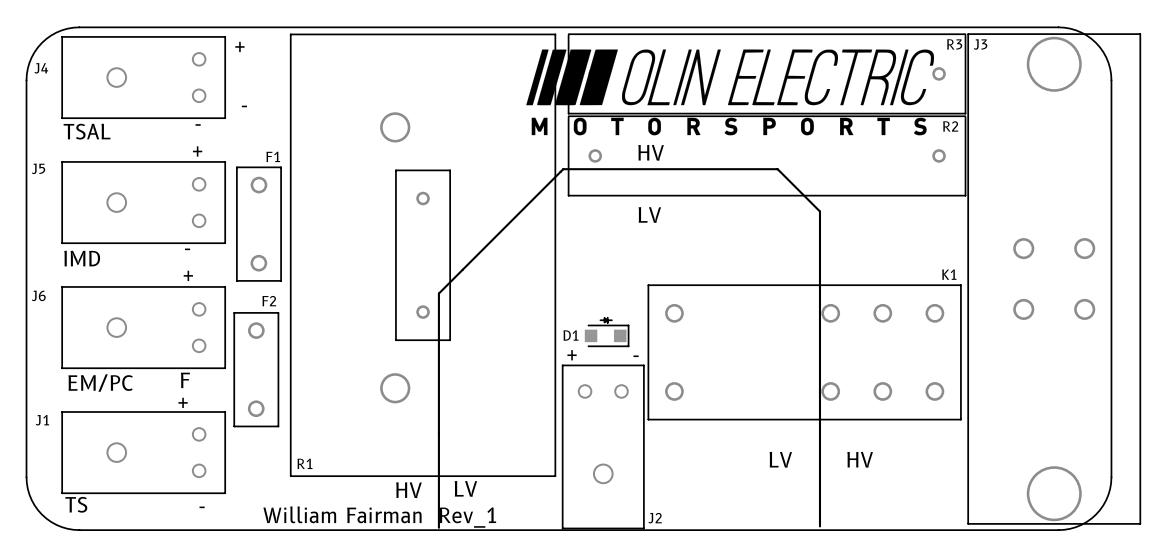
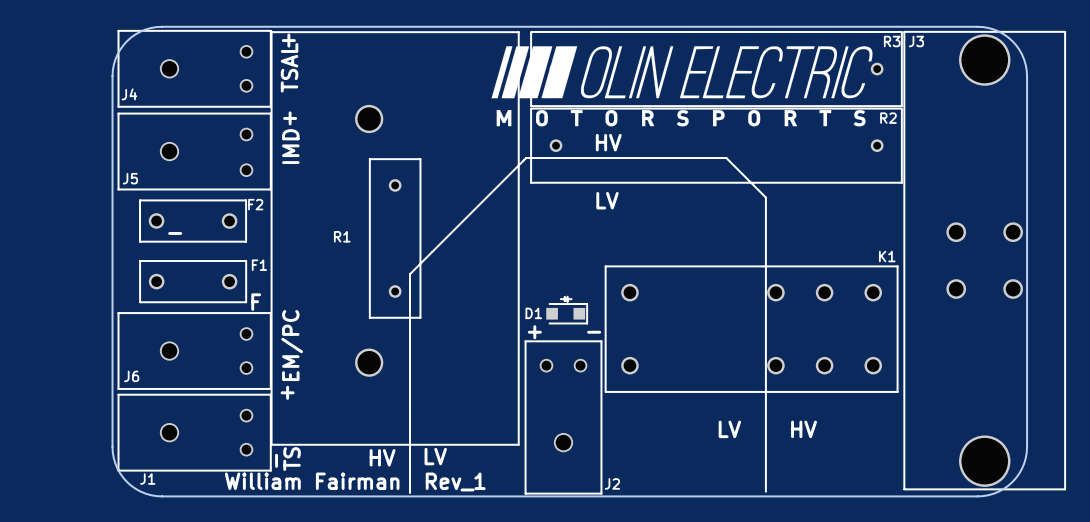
board edge: (79, 27) (1058, 27) (1081, 32) (1095, 42) (1103, 52) (1110, 68) (1111, 80) (1111, 477) (1106, 500) (1095, 514) (1086, 522) (1076, 527) (1058, 530) (79, 530) (56, 524) (42, 514) (34, 505) (26, 483) (26, 80) (31, 57) (42, 42) (56, 32) (79, 27) -> (161, 26) (140, 31) (126, 41) (117, 54) (112, 76) (112, 452) (115, 463) (123, 477) (140, 491) (161, 496) (977, 496) (993, 493) (1003, 488) (1012, 481) (1022, 468) (1027, 446) (1027, 76) (1025, 65) (1019, 49) (1012, 41) (999, 31) (977, 26) (161, 26)
text: none -> + (288, 40)
text: + (239, 46) -> none
J4 name position: J4 (41, 68) -> J4 (129, 94)
J4 position: (143, 77) -> (194, 68)
text: - (244, 106) -> none
text: - (198, 124) -> none
text: none -> + (290, 118)
text rotation: 0° (87, 131) -> 90° counterclockwise (289, 67)
text position: TSAL (87, 131) -> TSAL (289, 67)
text: + (197, 151) -> none
F1 name position: F1 (273, 156) -> F1 (259, 265)
J5 footprint: [61, 161, 226, 244] -> [117, 112, 272, 191]
J5 name position: J5 (38, 168) -> J5 (130, 178)
F1 rotation: 0° (258, 224) -> 90° clockwise (193, 281)
F1 position: (258, 224) -> (193, 281)
text rotation: 0° (82, 258) -> 90° counterclockwise (290, 146)
text position: IMD (82, 258) -> IMD (290, 146)
text: + (188, 275) -> none
J6 name position: J6 (38, 295) -> J6 (131, 376)
F2 name position: F2 (269, 301) -> F2 (255, 204)
J6 position: (143, 327) -> (194, 351)
F2 rotation: 0° (256, 369) -> 90° clockwise (193, 221)
F2 position: (256, 369) -> (193, 221)
text position: F (185, 380) -> F (256, 302)
text rotation: 0° (100, 383) -> 90° counterclockwise (292, 345)
text position: EM/PC (100, 383) -> EM/PC (292, 345)
text: + (183, 402) -> none
J1 name position: J1 (42, 420) -> J1 (147, 478)
text: none -> + (287, 392)
J1 position: (143, 452) -> (194, 432)
R1 name position: R1 (304, 463) -> R1 (342, 236)
text rotation: 0° (76, 504) -> 90° counterclockwise (292, 459)
text position: TS (76, 504) -> TS (292, 459)
text rotation: 0° (202, 507) -> 90° counterclockwise (276, 460)
text position: - (202, 507) -> - (276, 460)

